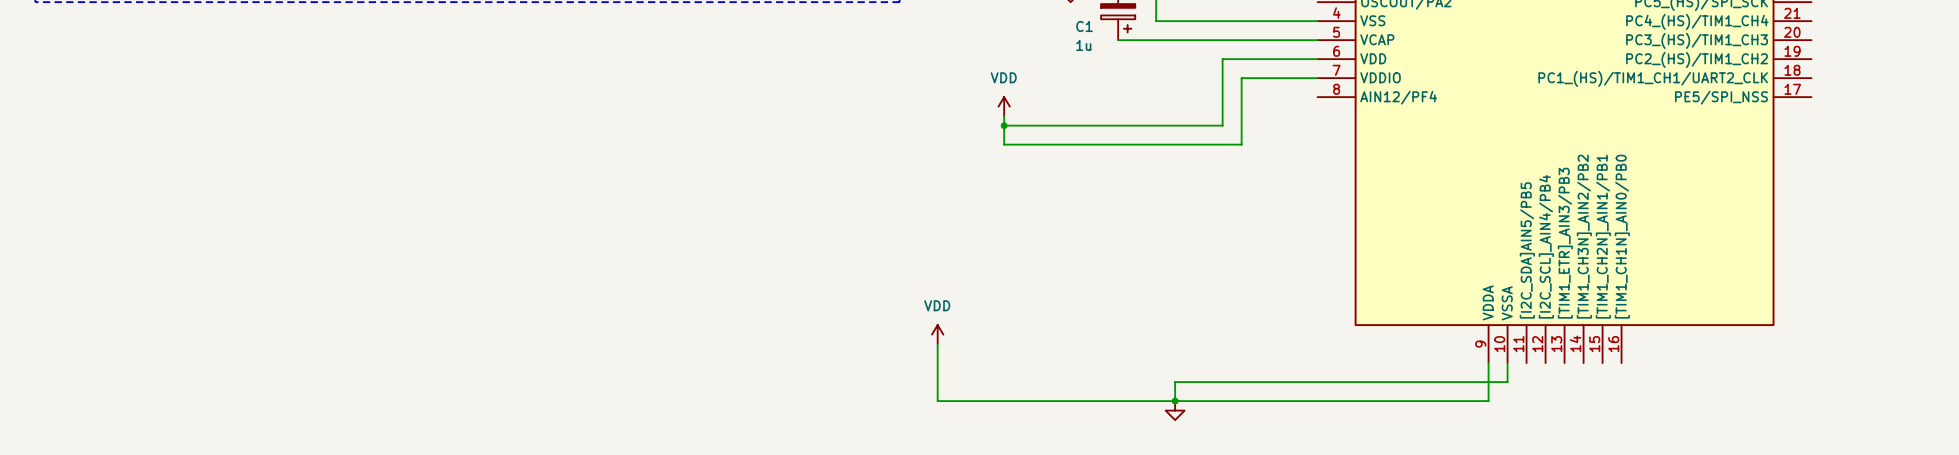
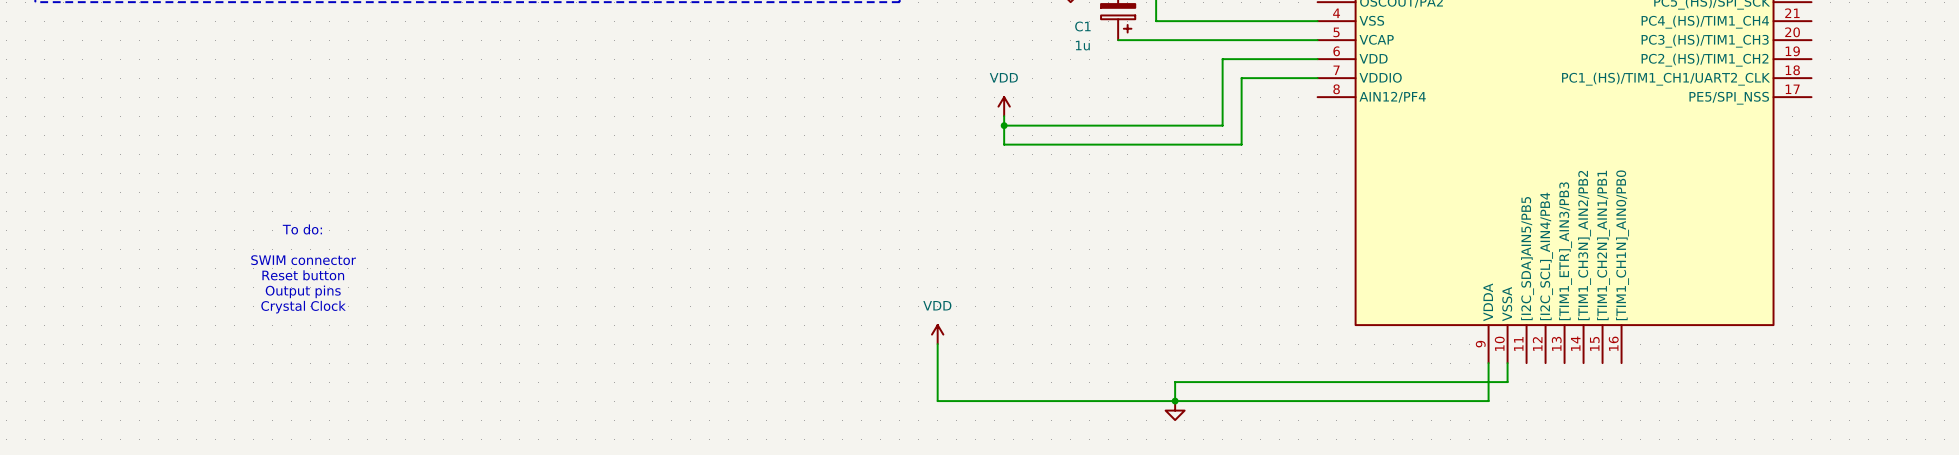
text: none -> To do: (302, 229)
text: none -> SWIM connector (303, 260)
text: none -> Reset button (303, 275)
text: none -> Output pins (303, 291)
text: none -> Crystal Clock (303, 307)

